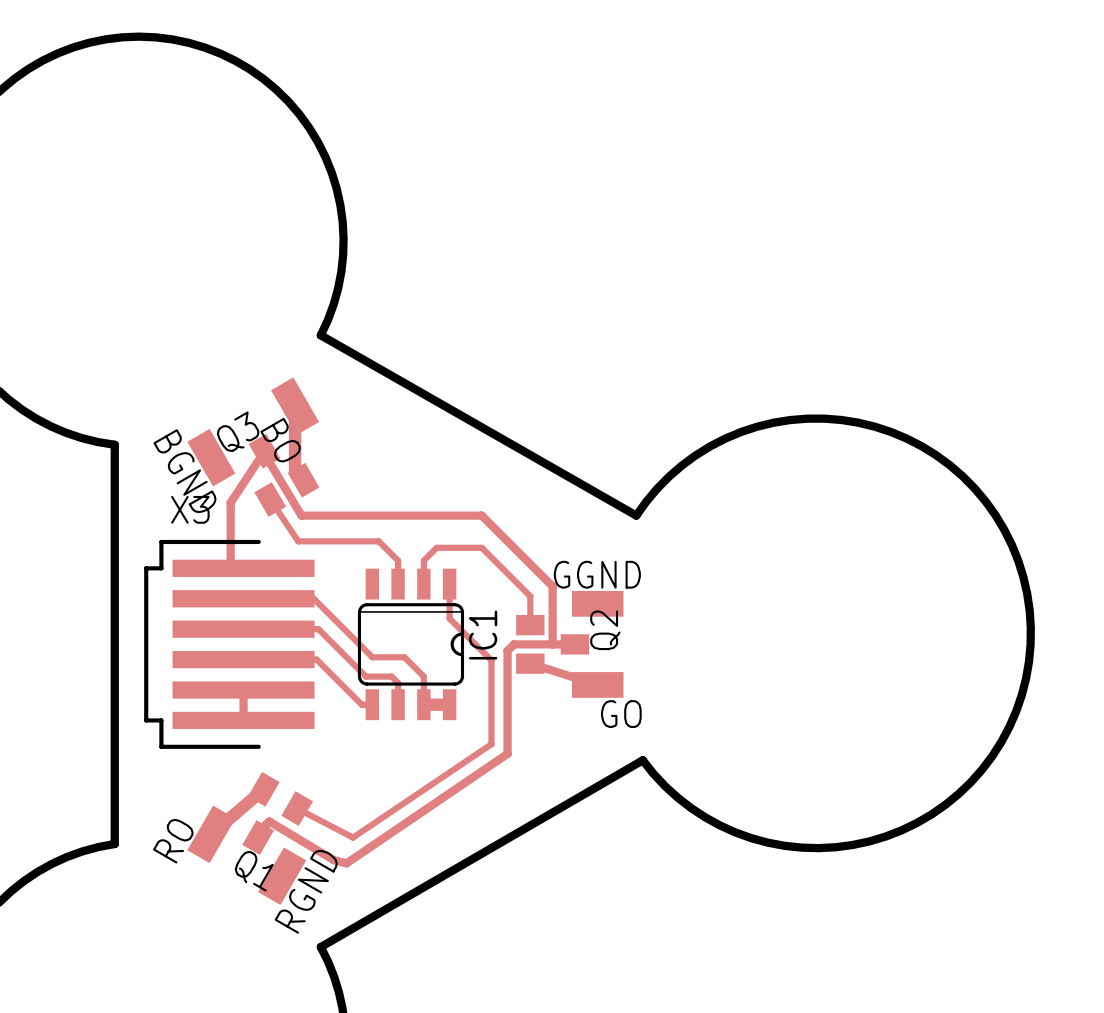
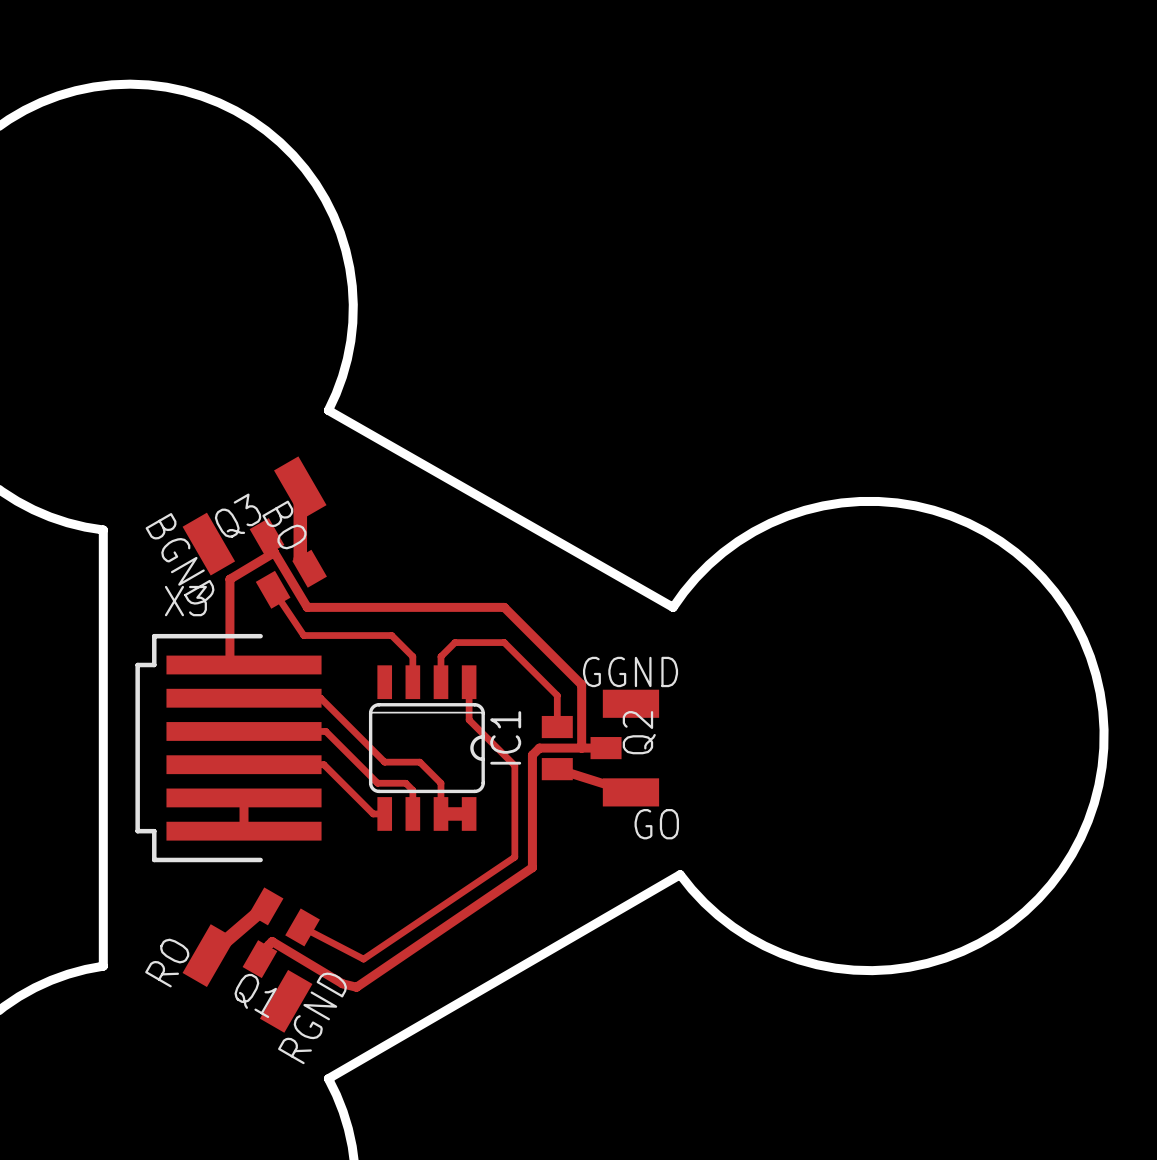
top track: (264, 451) (230, 502) (230, 567) -> (274, 552) (229, 579) (229, 663)

